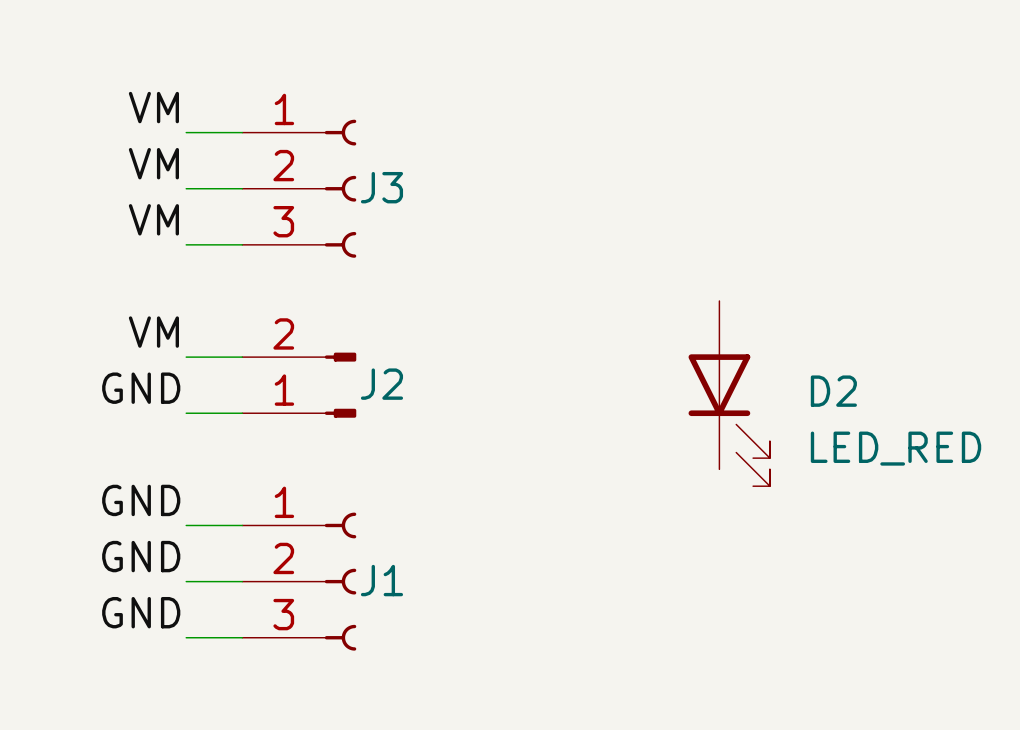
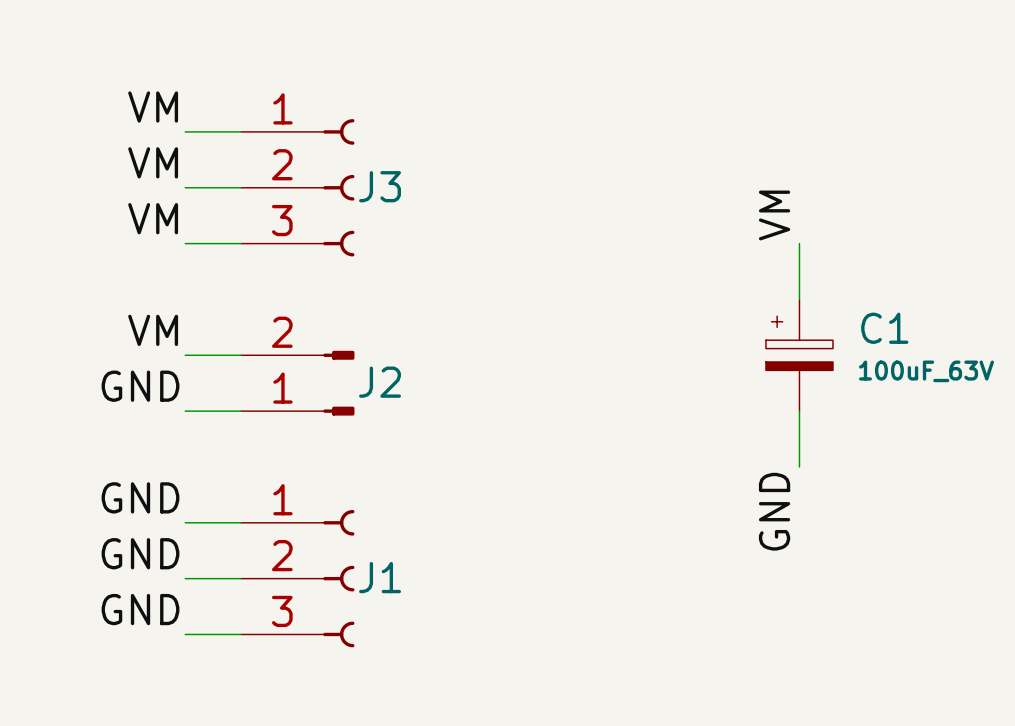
label: none -> VM (774, 215)
wire: none -> (799, 243) (799, 299)
C1: none -> 100uF_63V (799, 355)
D2: LED_RED (729, 393) -> none
wire: none -> (799, 411) (799, 466)
label: none -> GND (774, 511)

